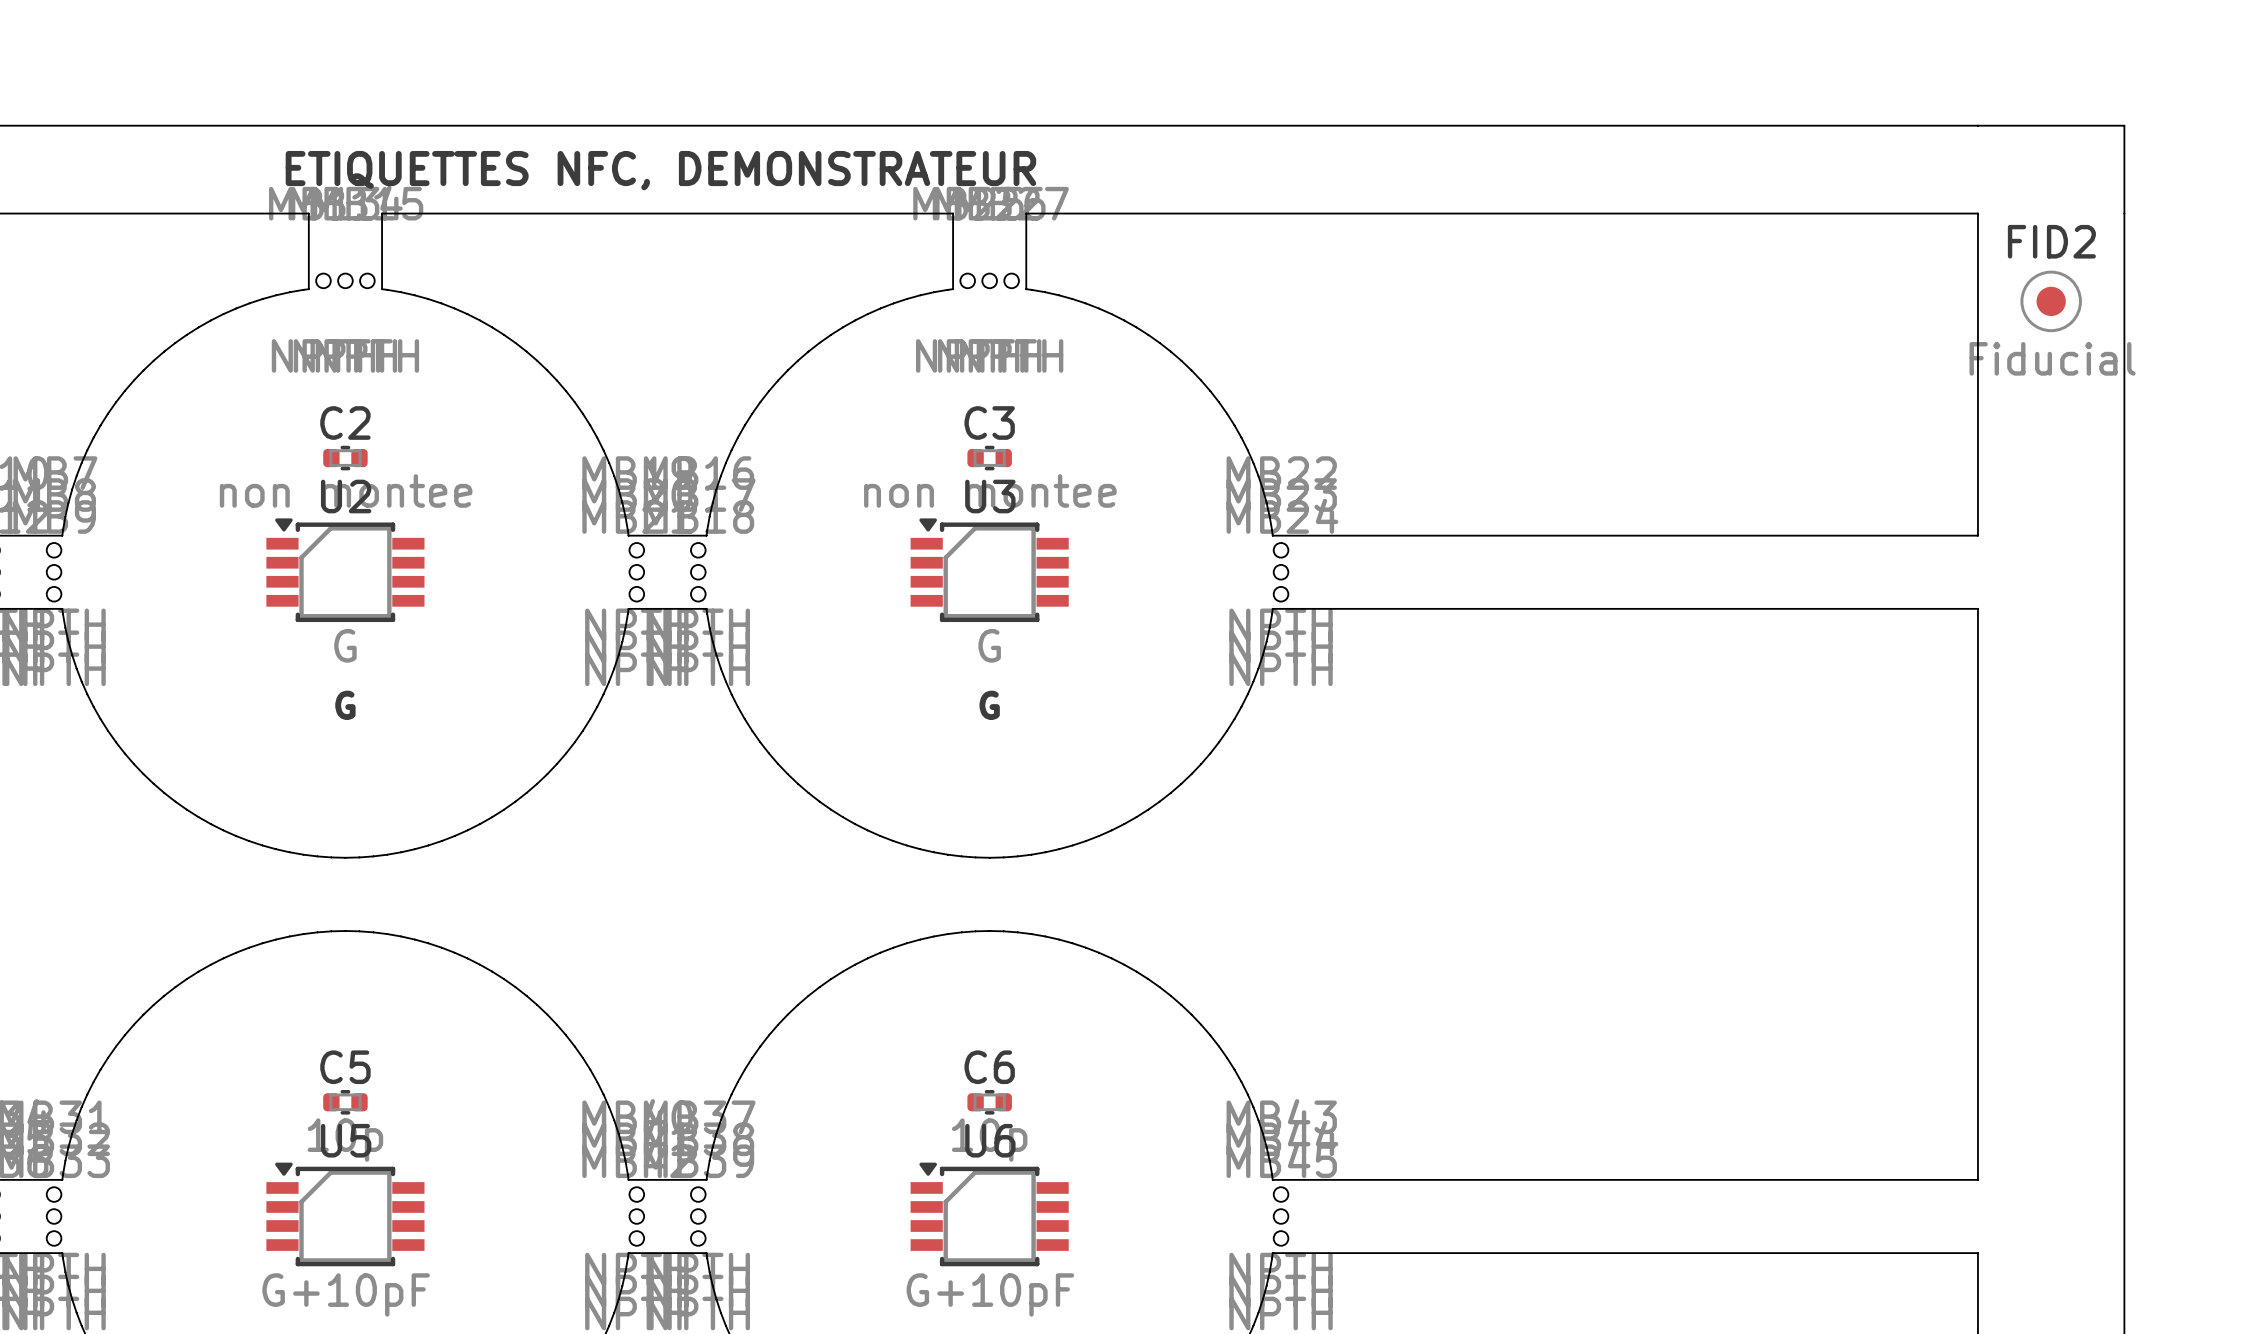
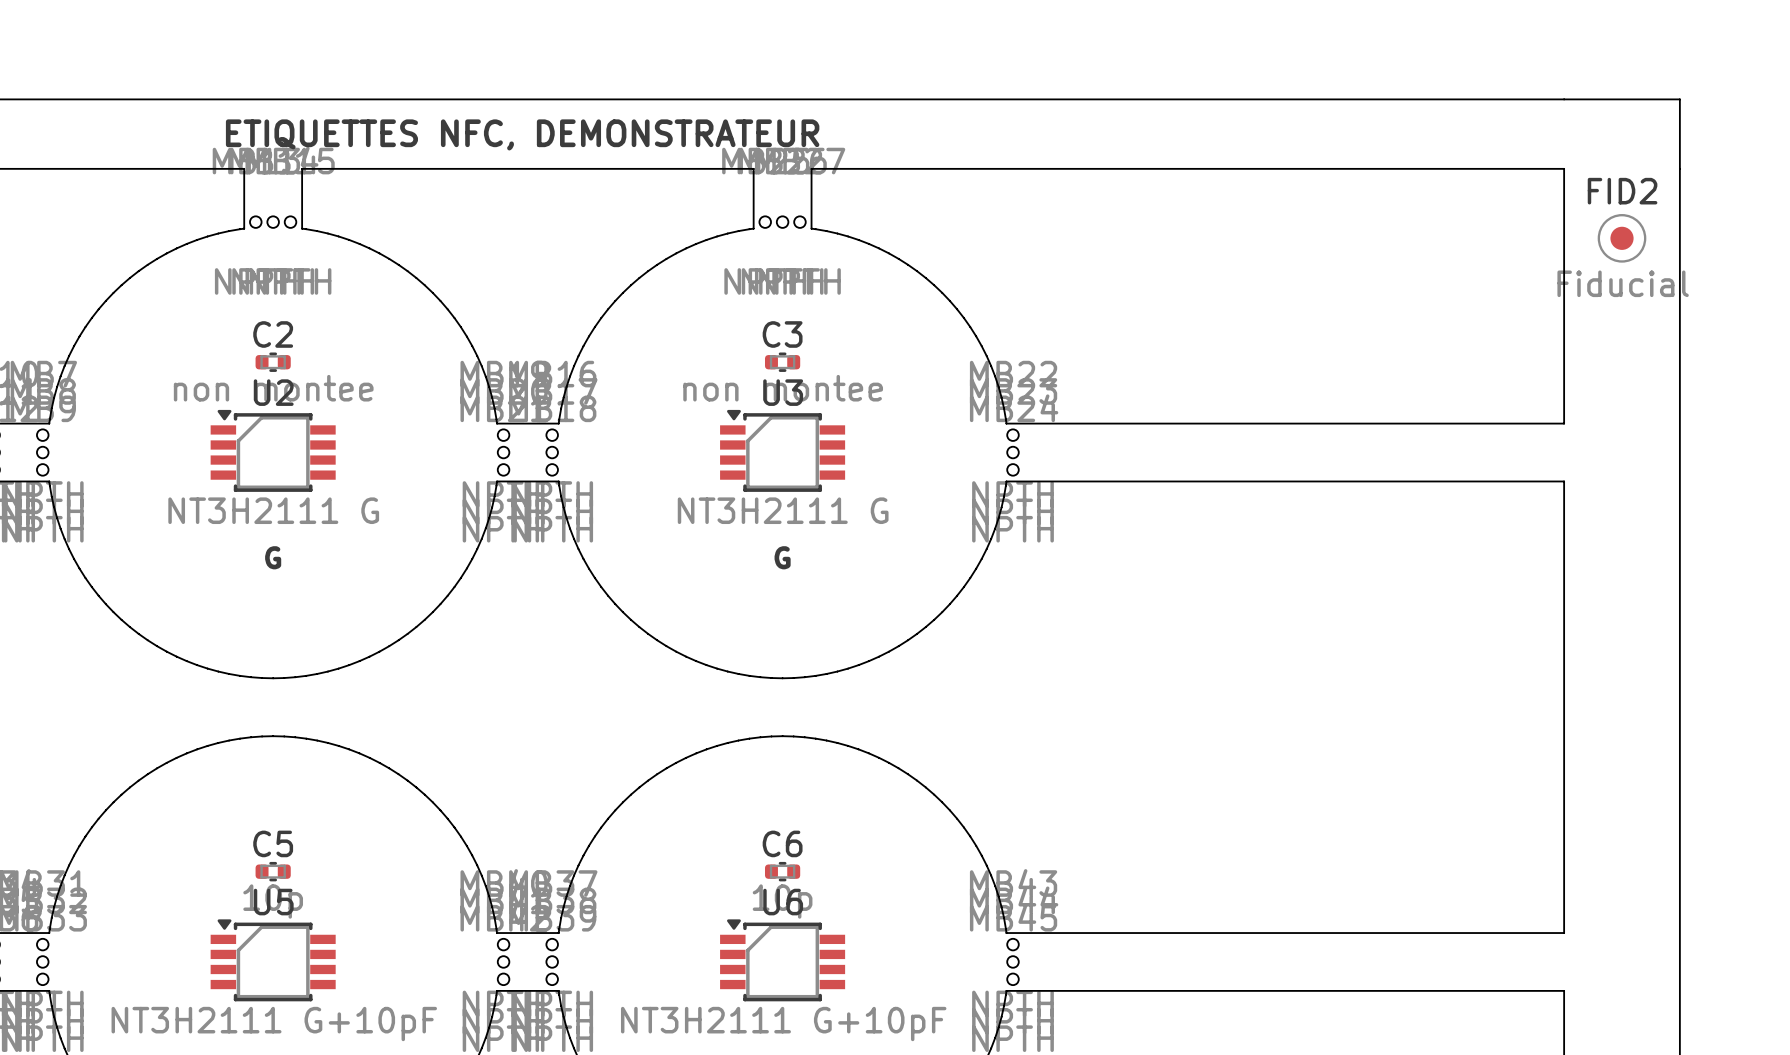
U2 value: G (345, 645) -> NT3H2111 G (273, 510)
U3 value: G (989, 645) -> NT3H2111 G (783, 510)
U5 value: G+10pF (346, 1294) -> NT3H2111 G+10pF (274, 1024)
U6 value: G+10pF (990, 1294) -> NT3H2111 G+10pF (783, 1024)

